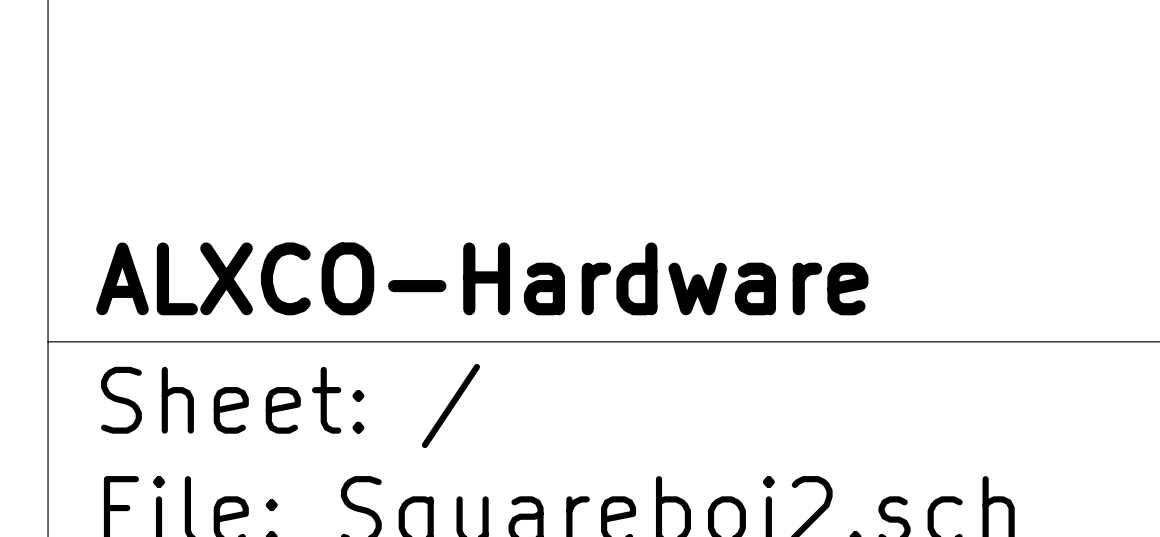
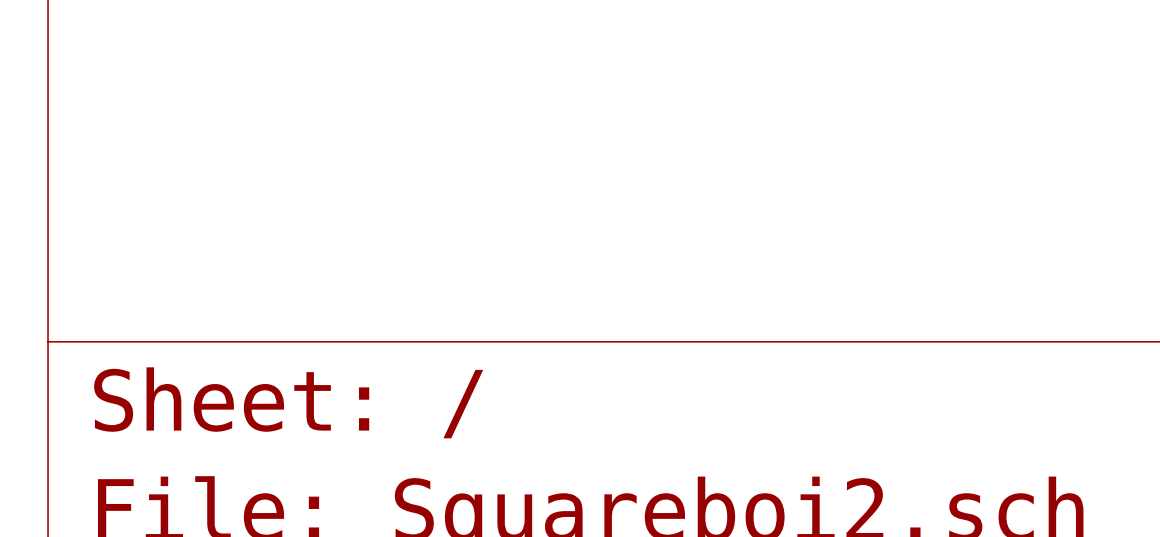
title block: ALXCO-Hardware (482, 278) -> none

